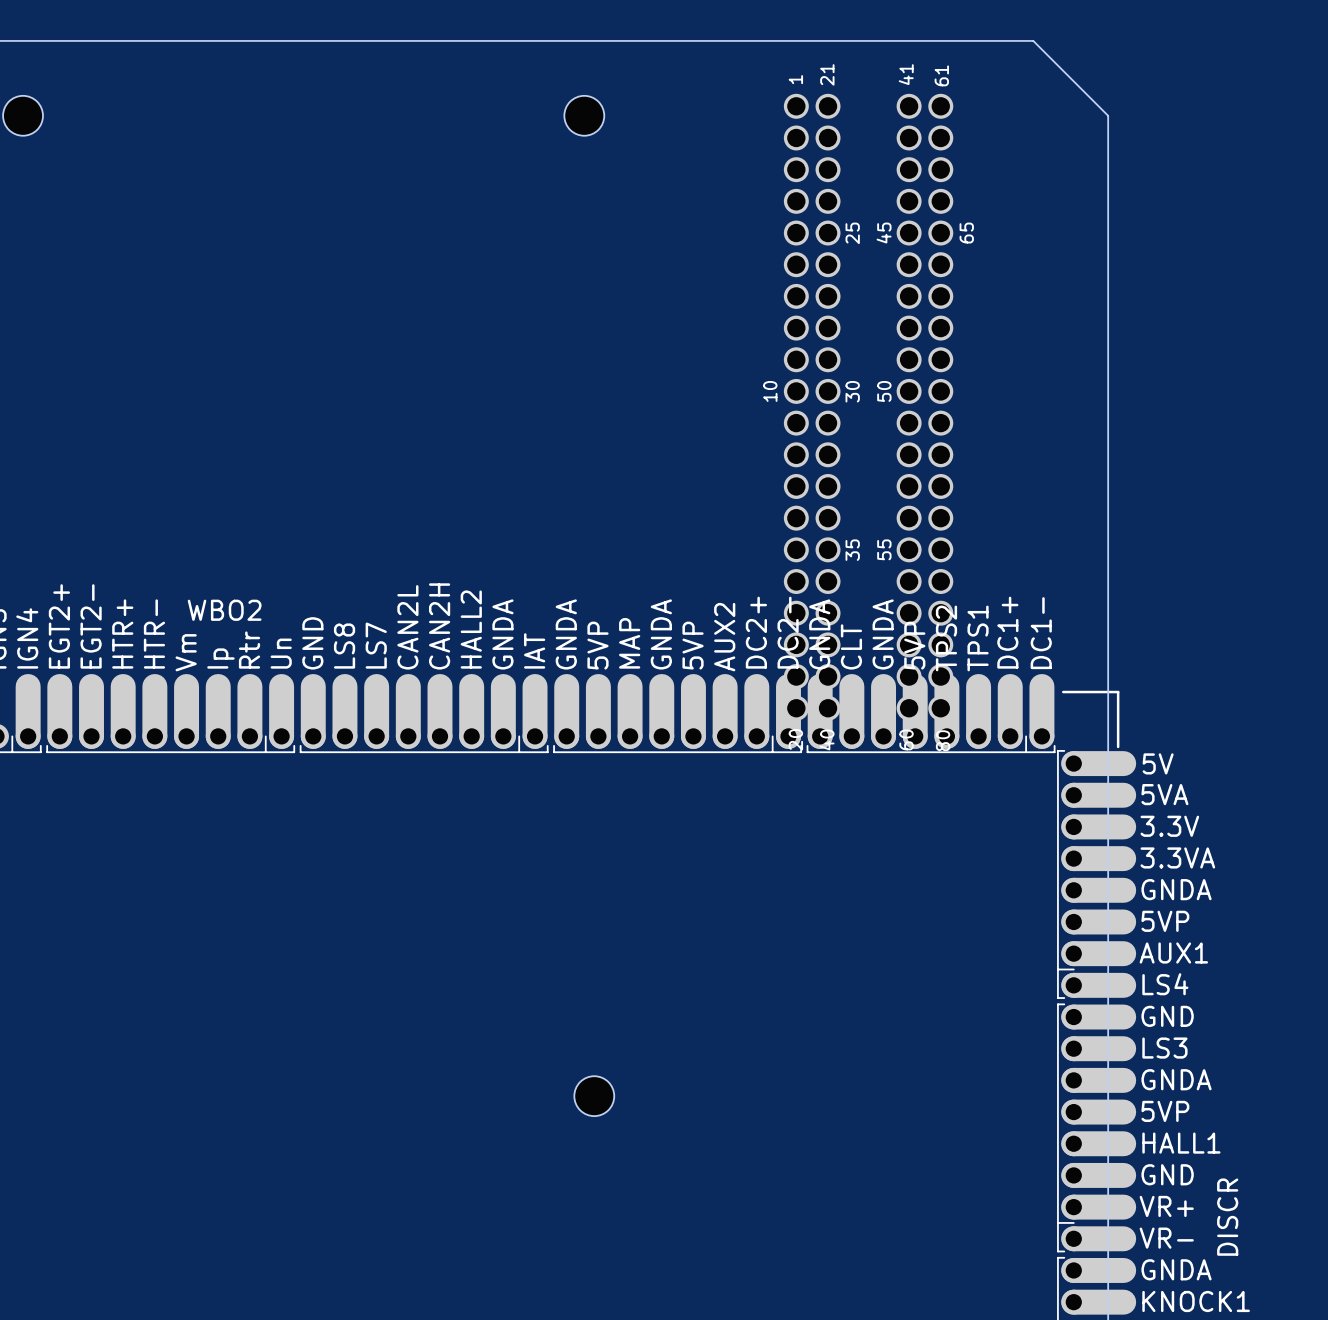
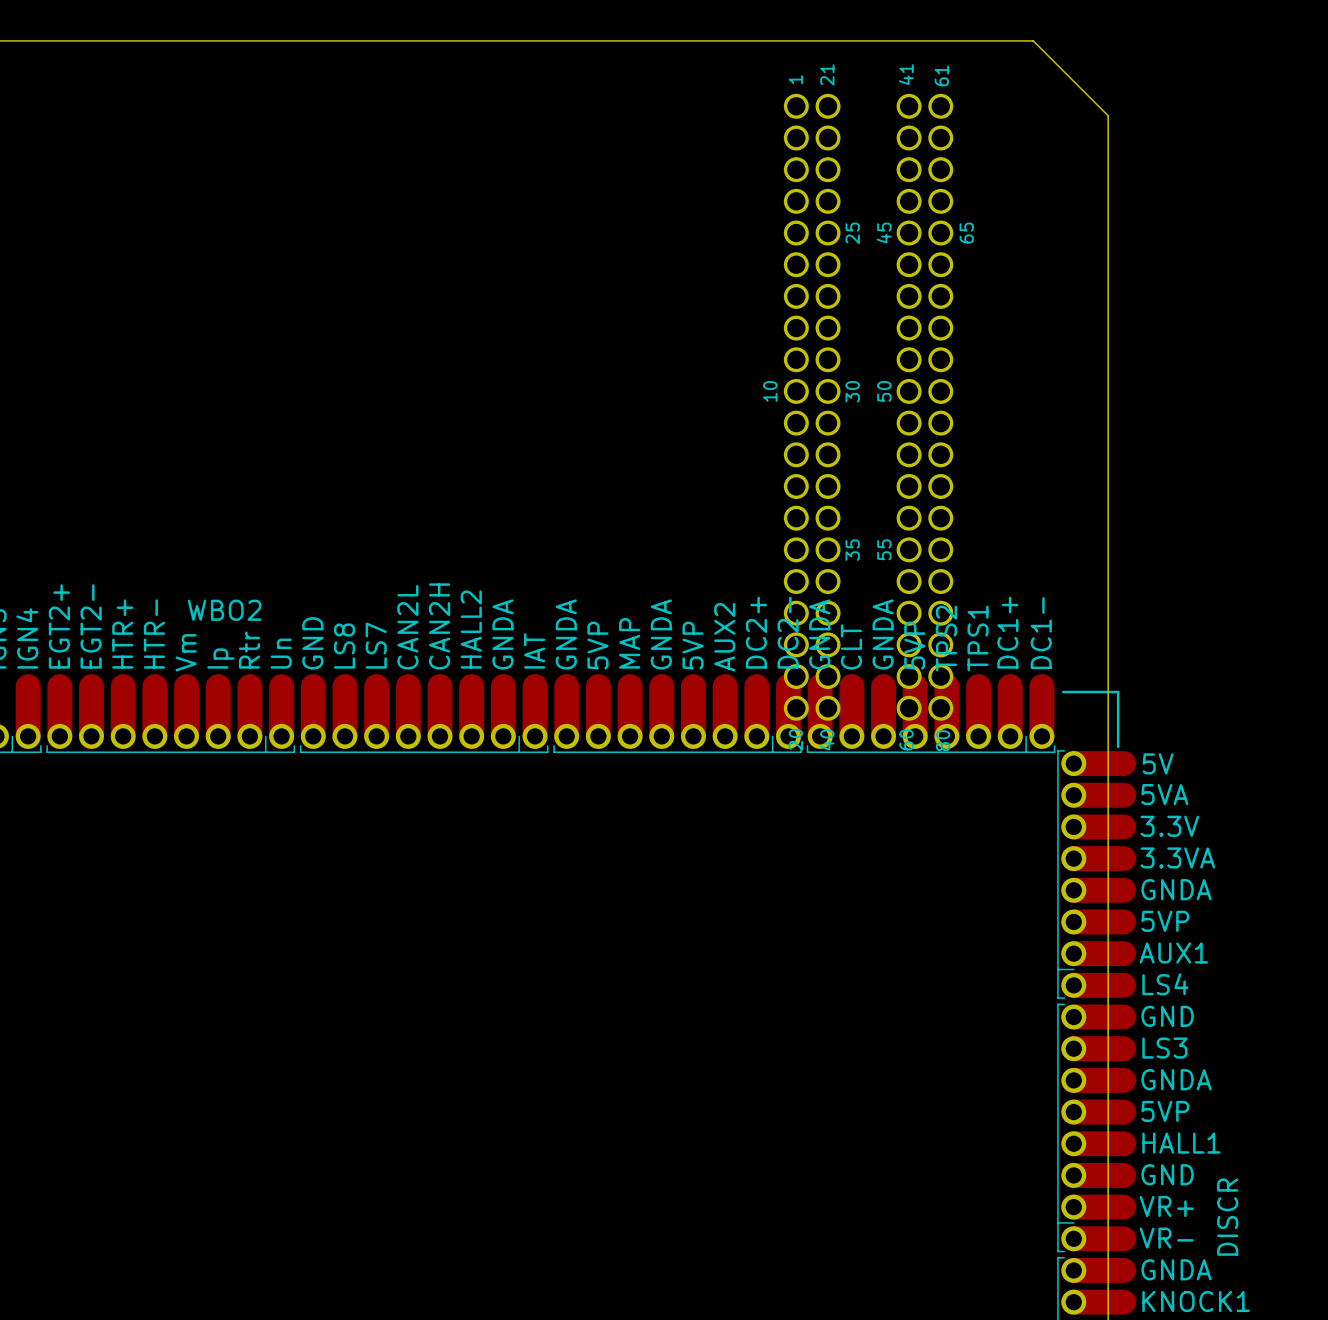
part: (23, 115) -> none
part: (584, 115) -> none
part: (594, 1096) -> none

